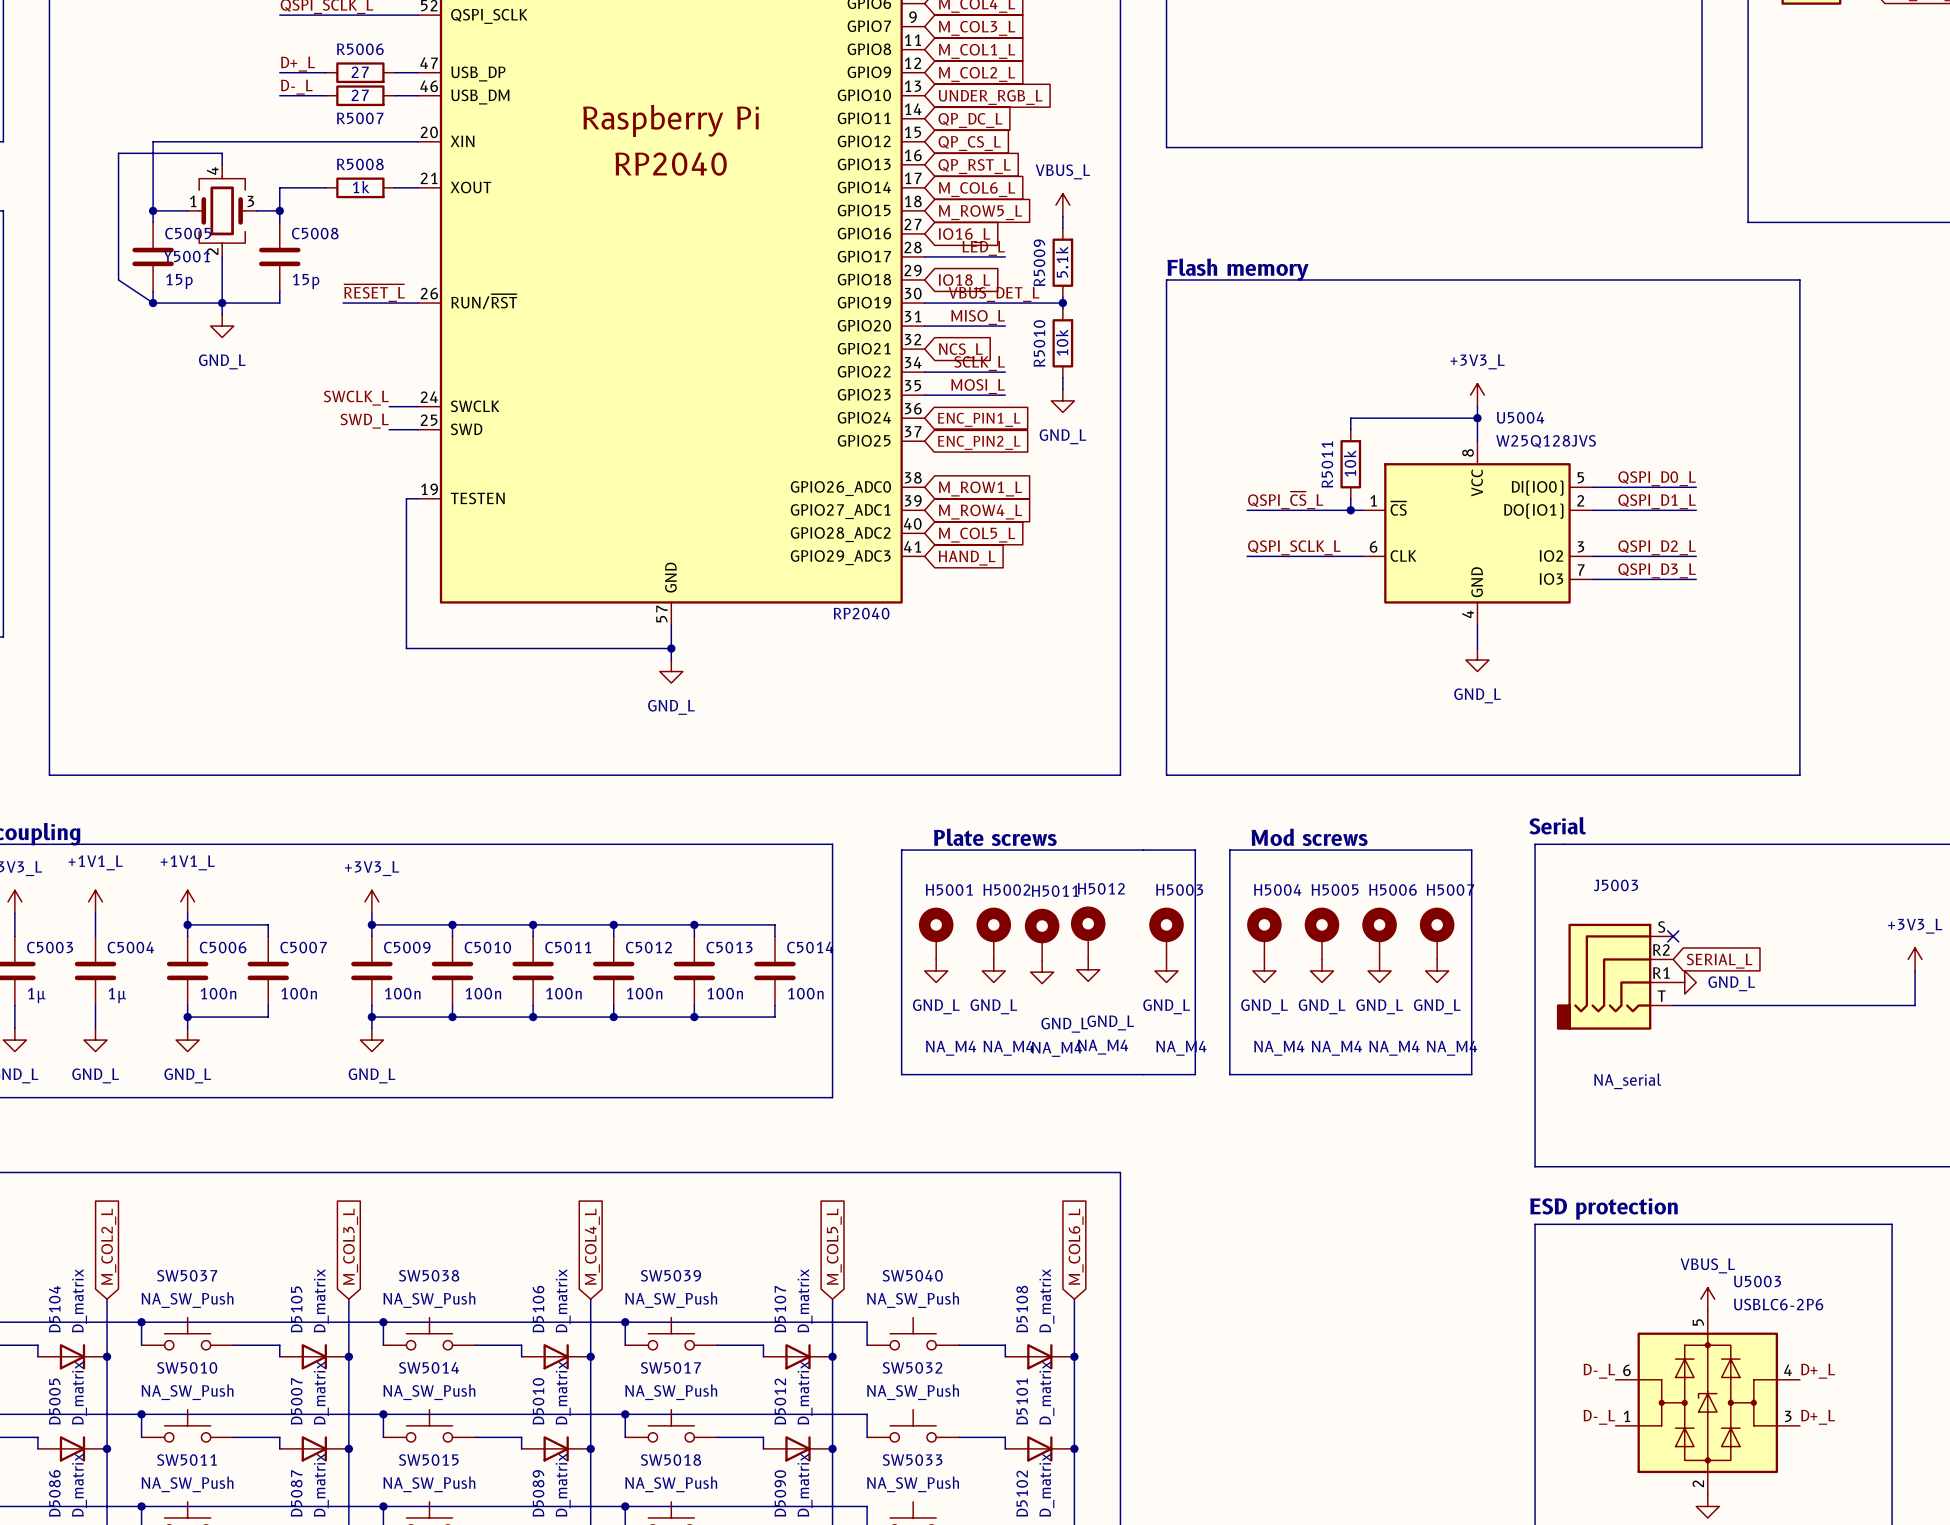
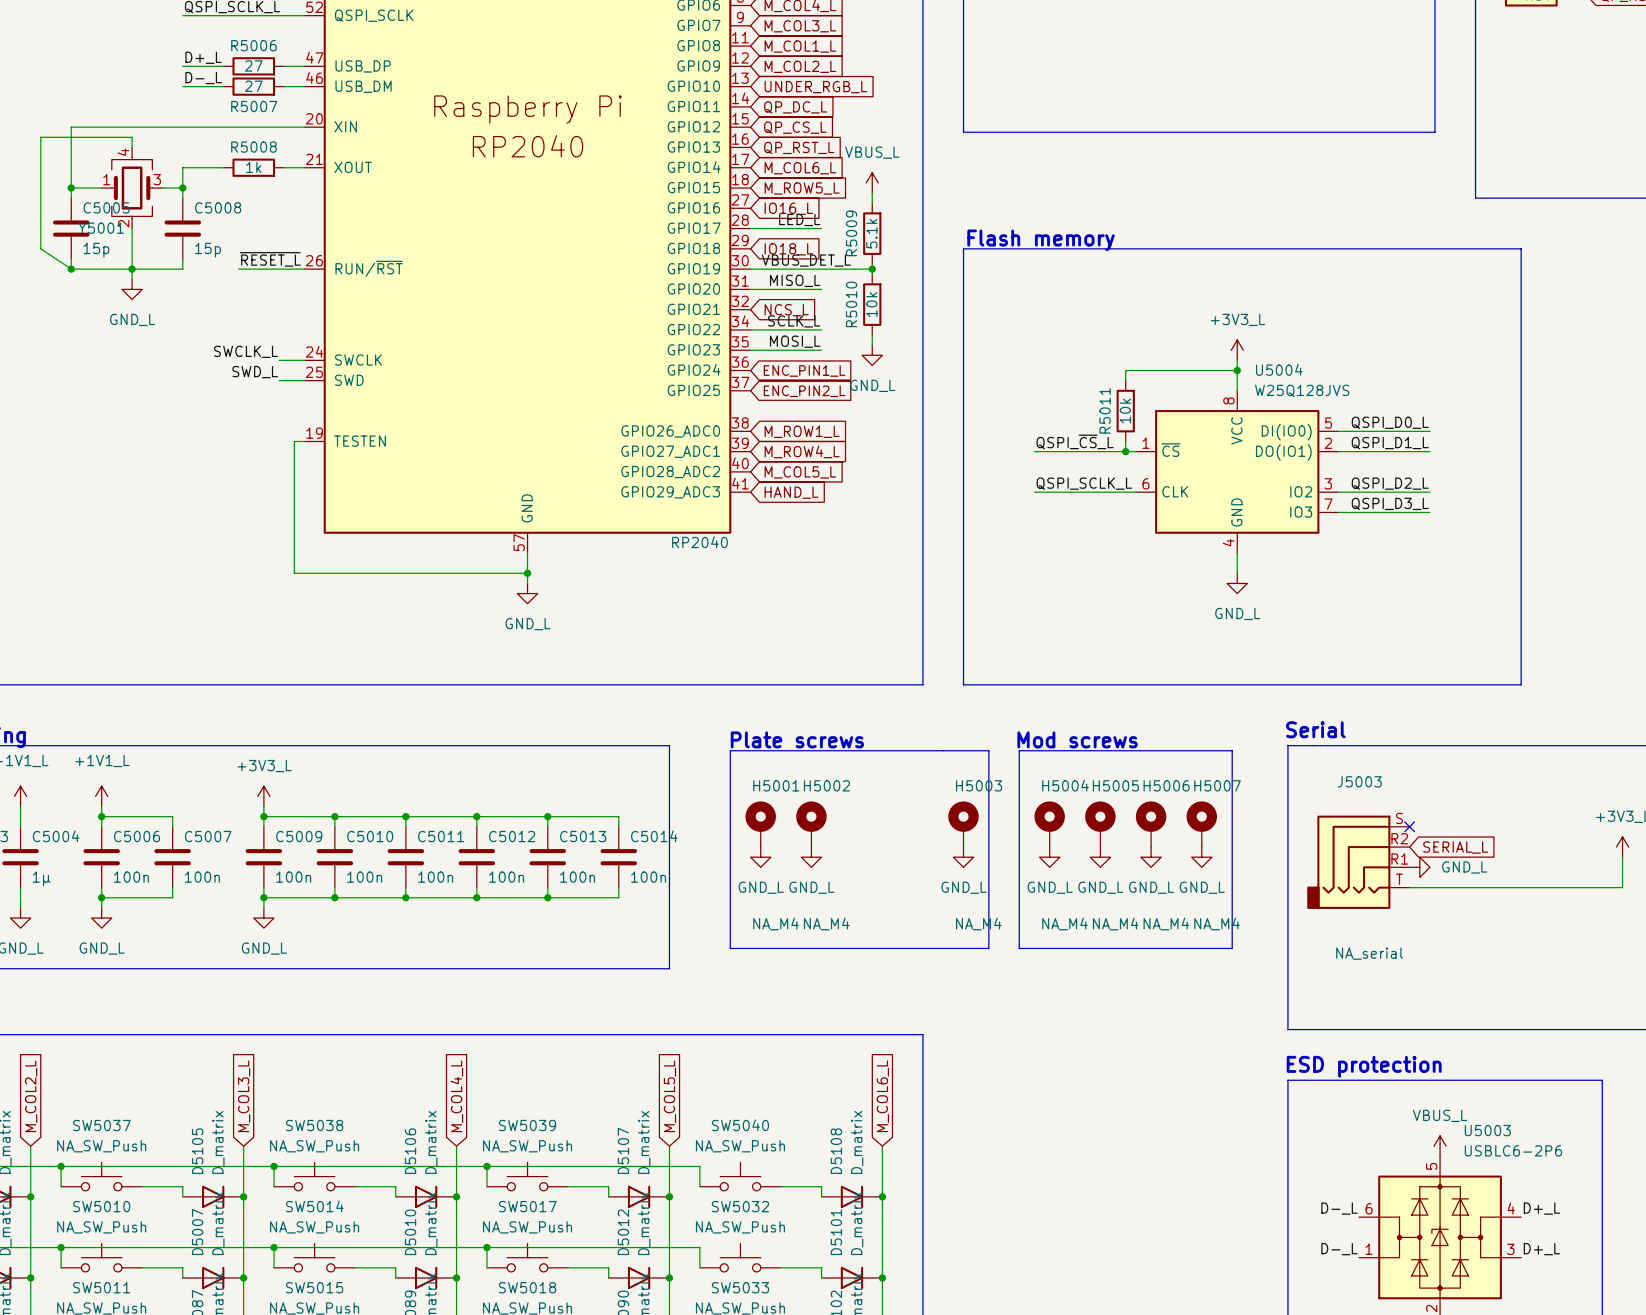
H5012: NA_M4 (1088, 932) -> none
H5011: NA_M4 (1042, 934) -> none
power symbol: GND_L (1088, 969) -> none
power symbol: GND_L (1042, 972) -> none

